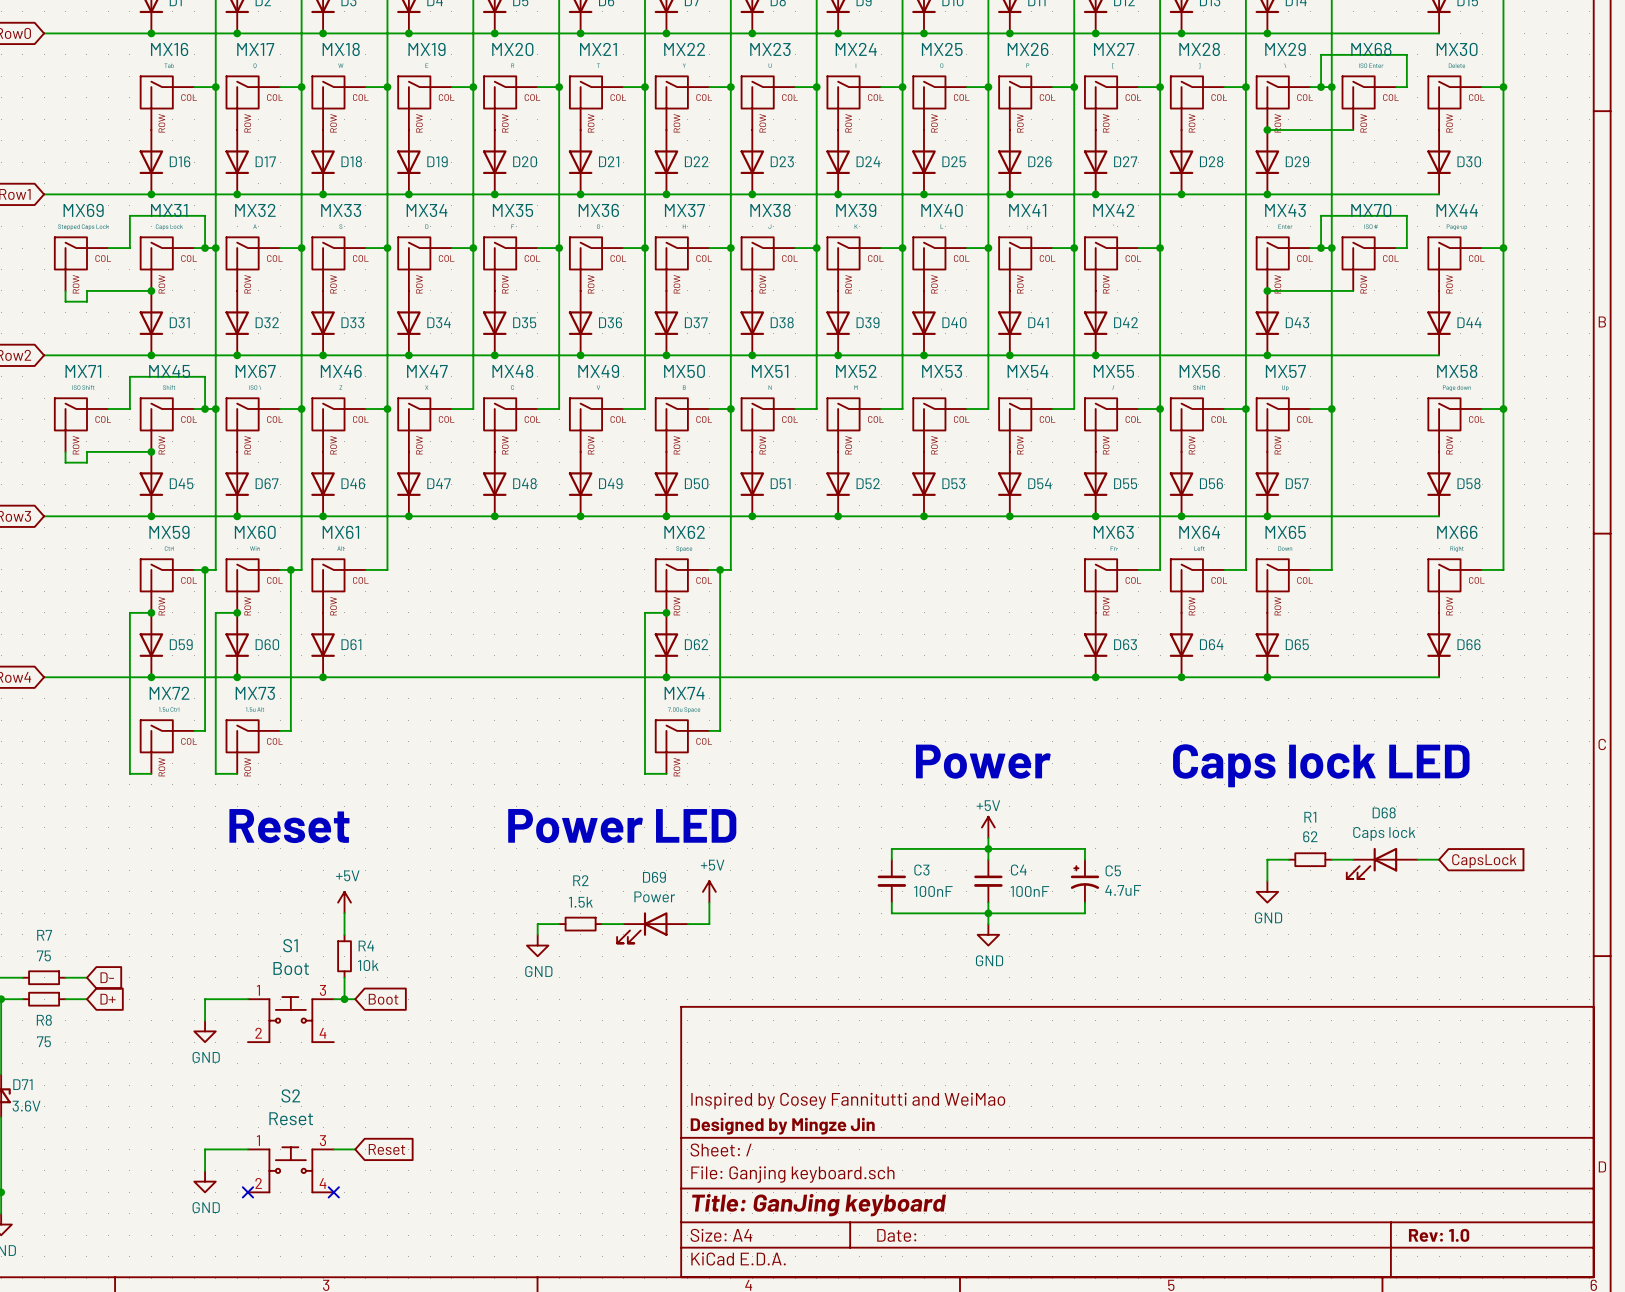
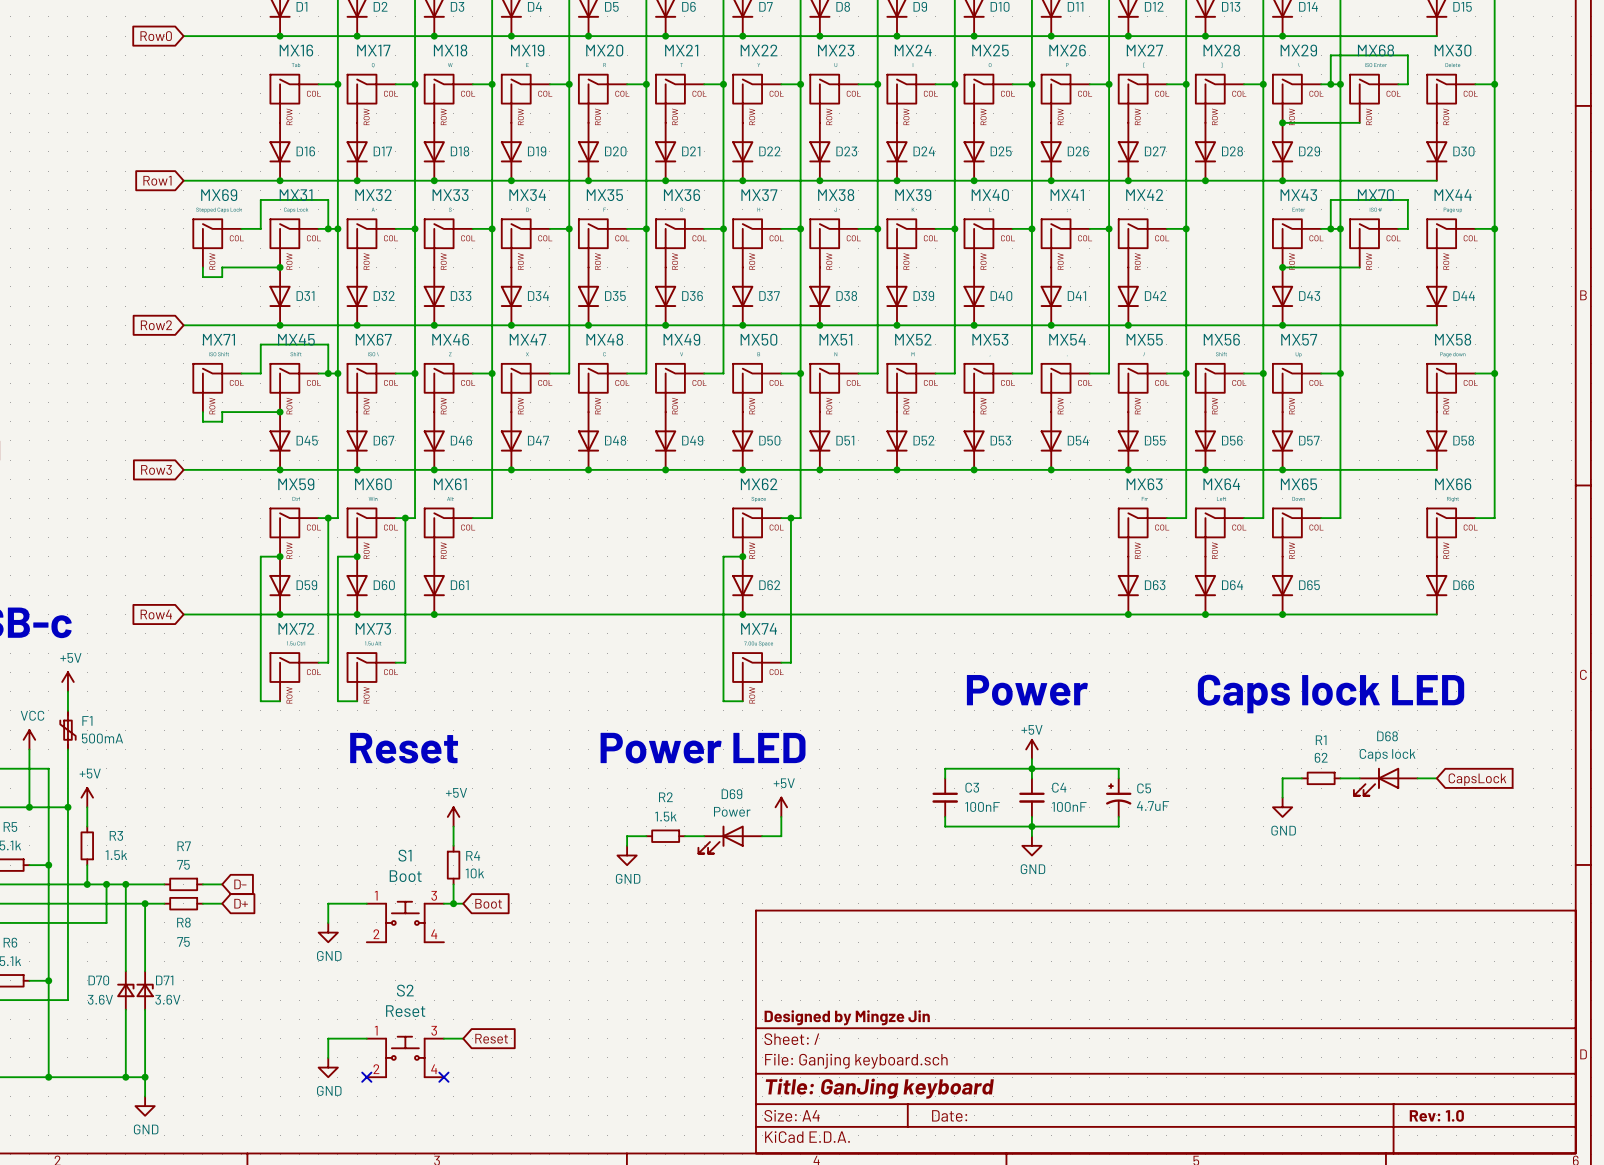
title block: Inspired by Cosey Fannitutti and WeiMao (848, 1101) -> none

